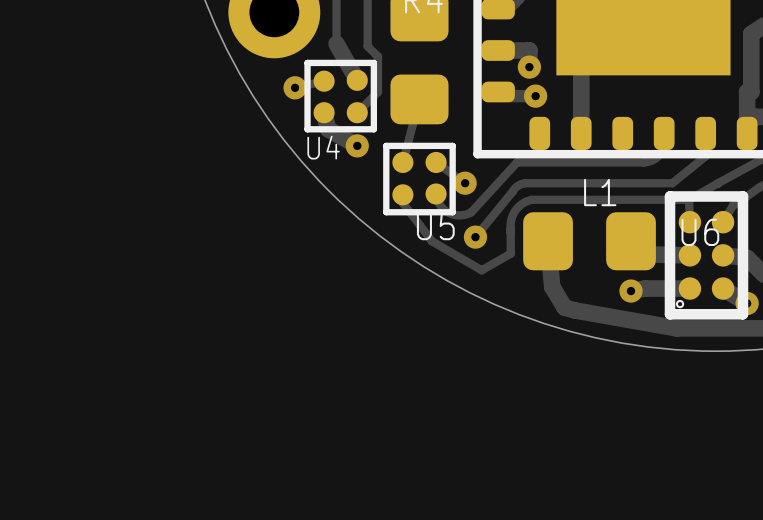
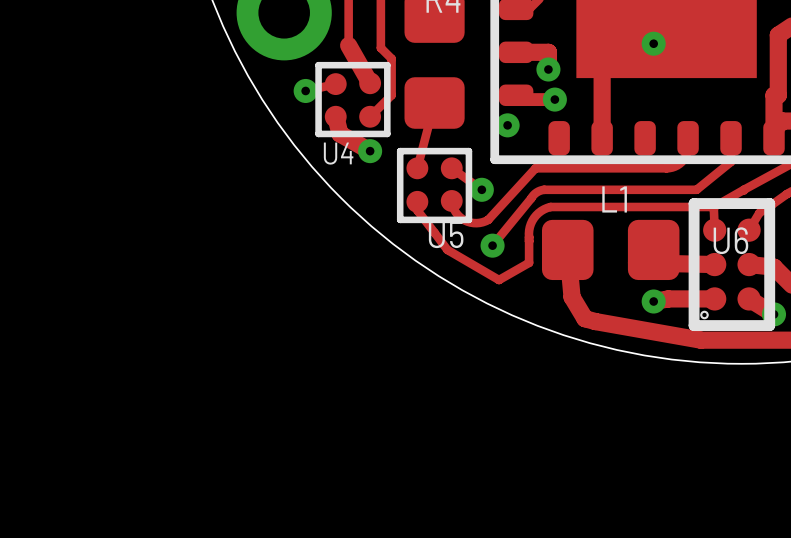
via: none -> (653, 43)
via: none -> (507, 125)

